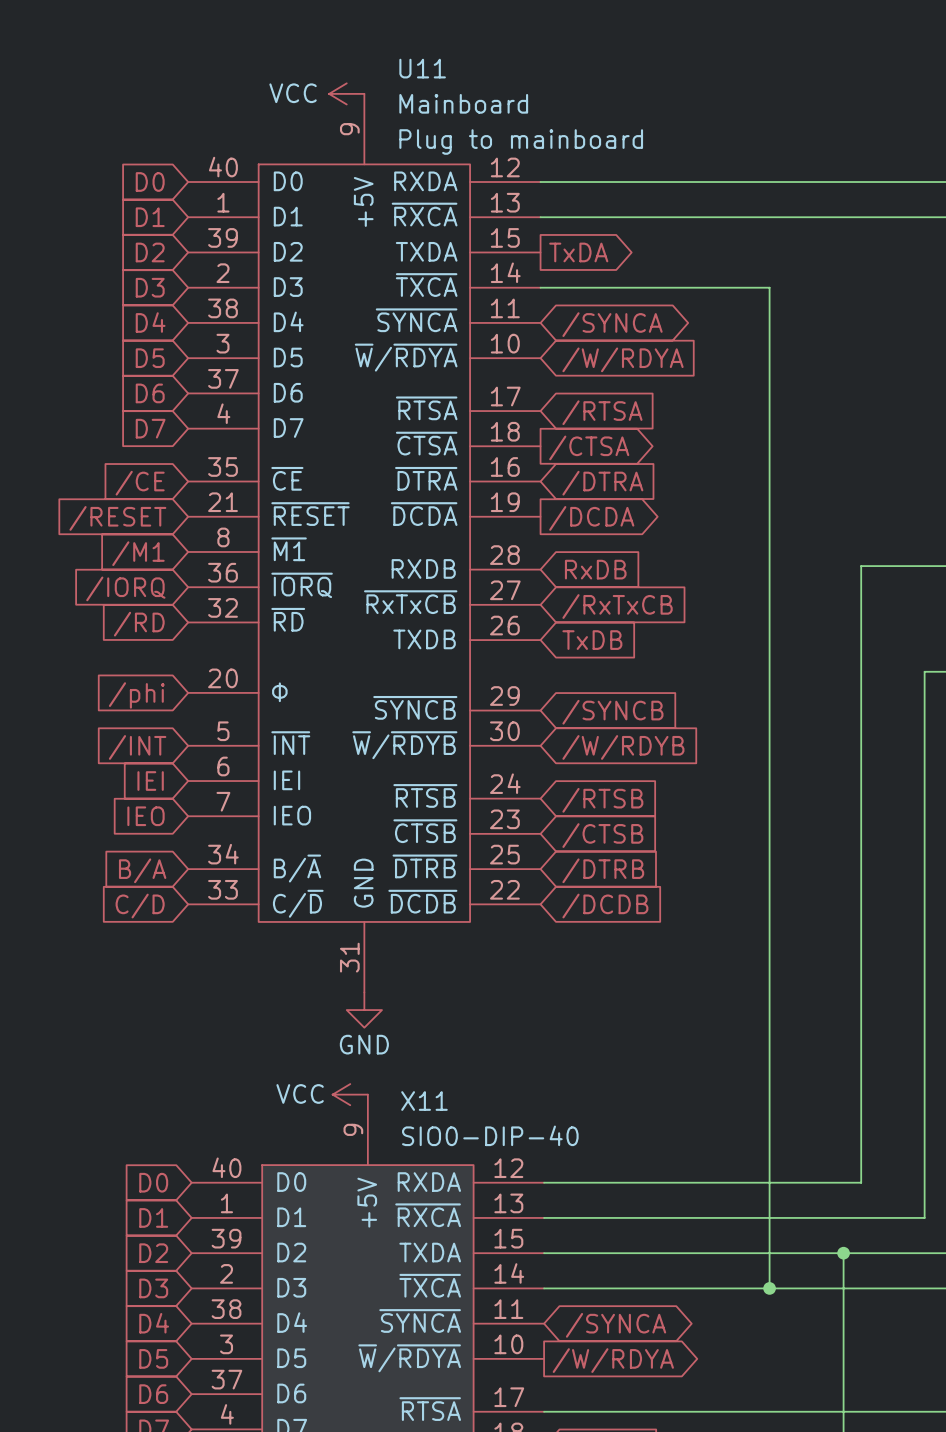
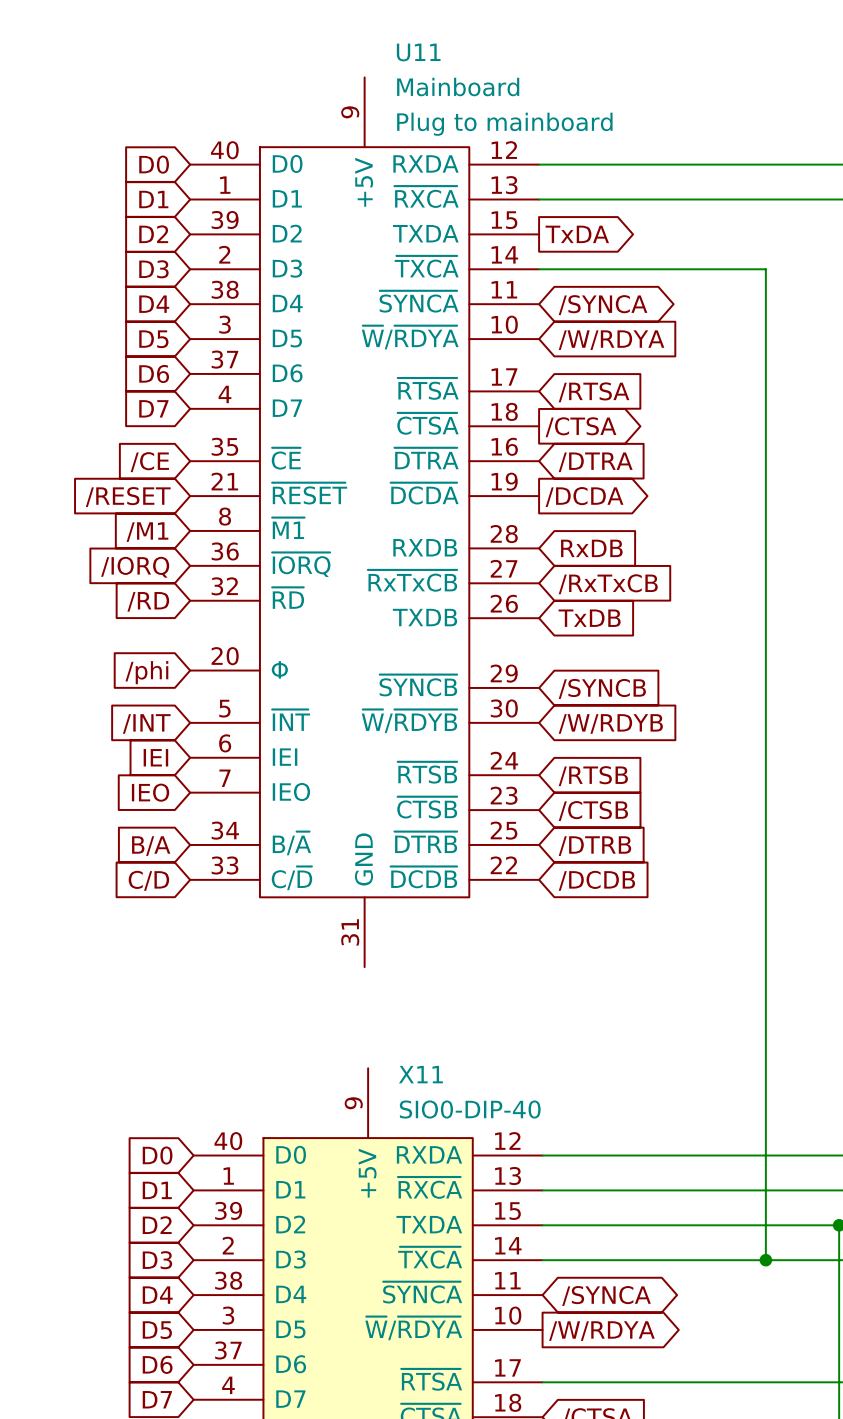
power symbol: VCC (346, 93) -> none
power symbol: GND (364, 1010) -> none
power symbol: VCC (350, 1094) -> none

